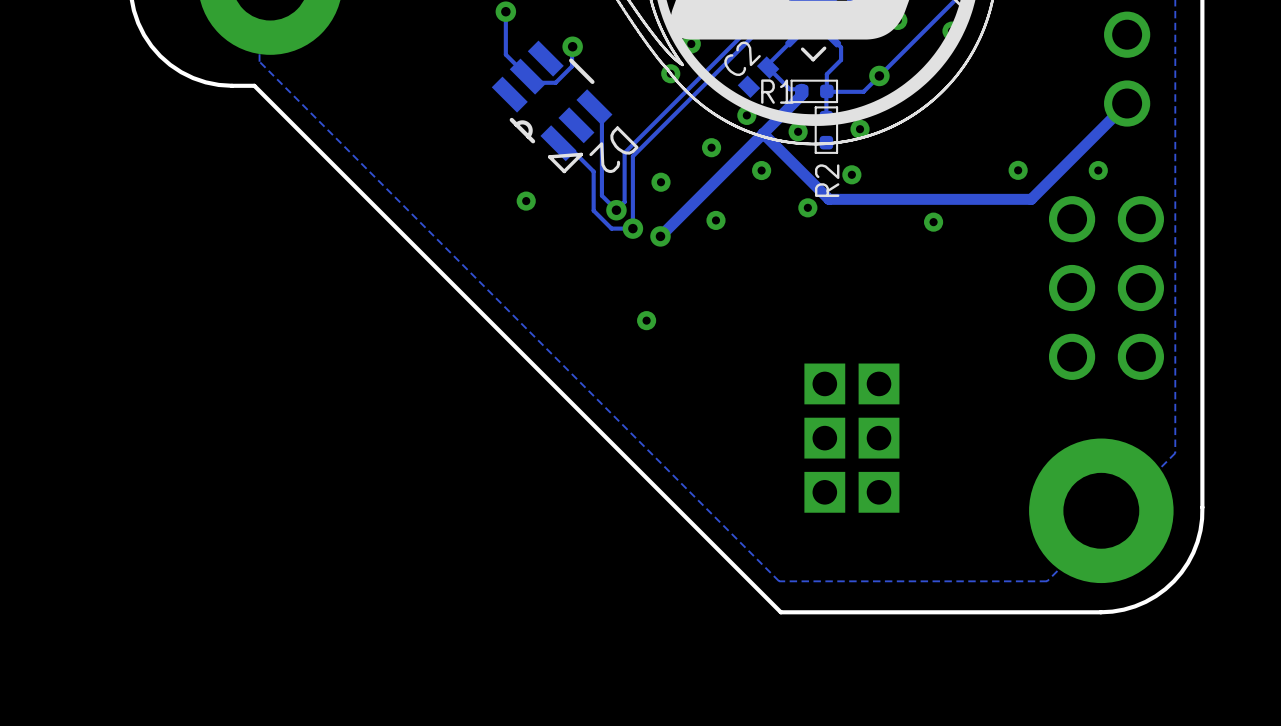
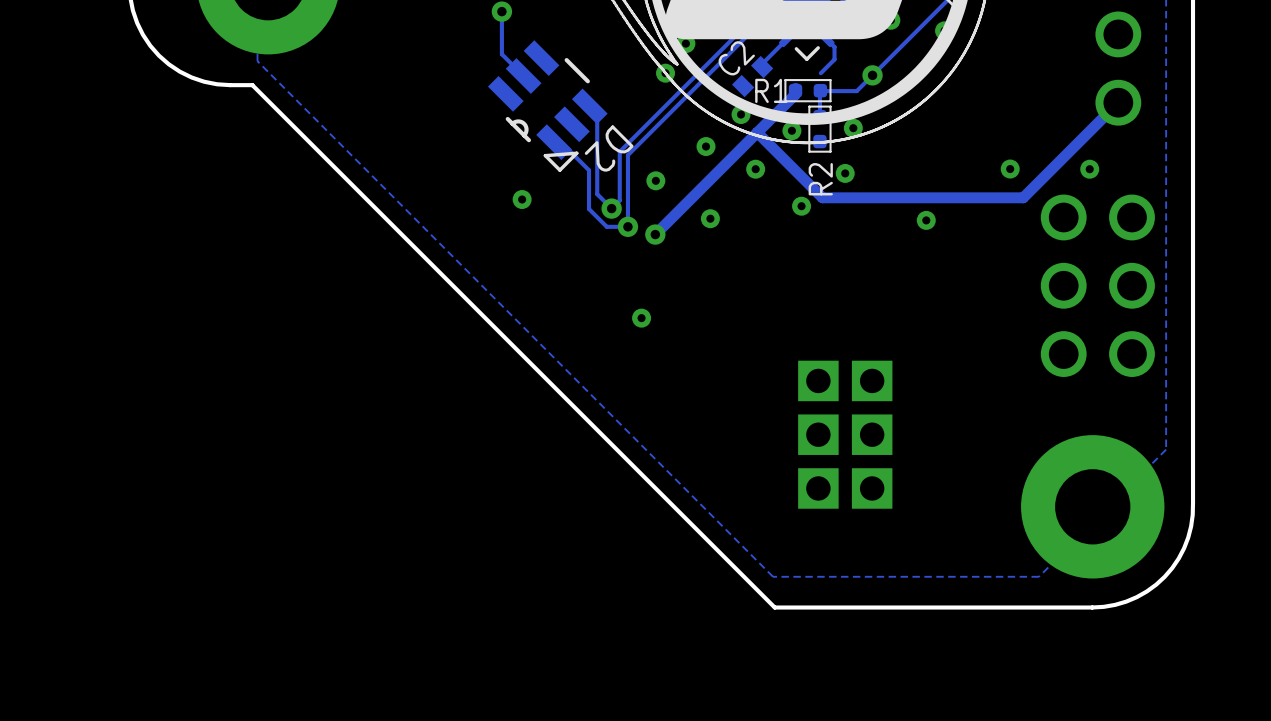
track: (572, 46) (572, 66) (555, 82) (533, 82) (527, 76) -> none
via: (572, 46) -> none
track: (768, 67) (789, 89) (801, 89) -> none
track: (827, 73) (826, 88) -> none

